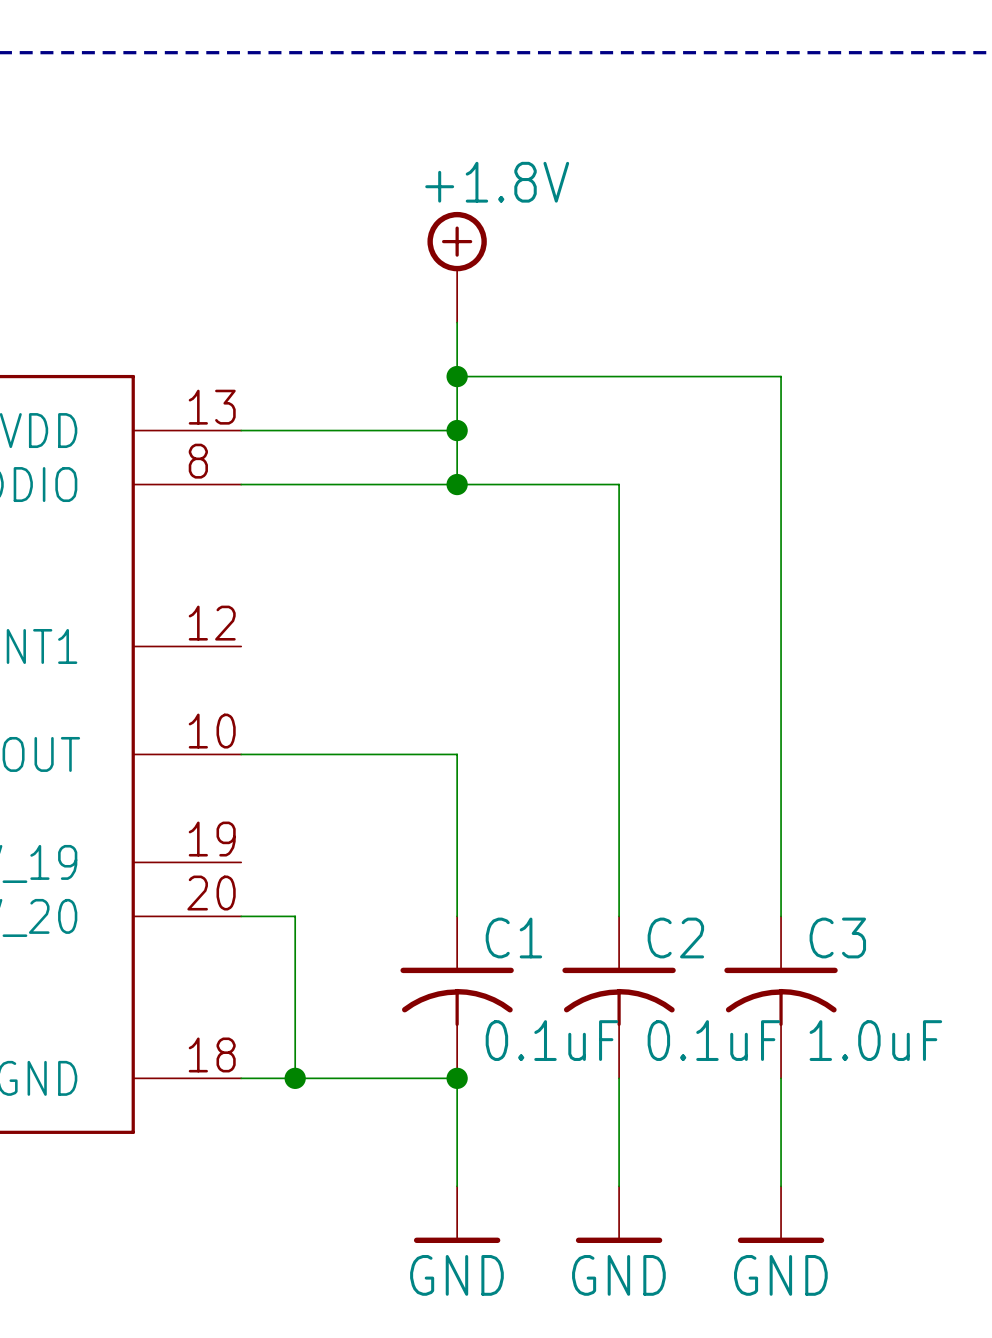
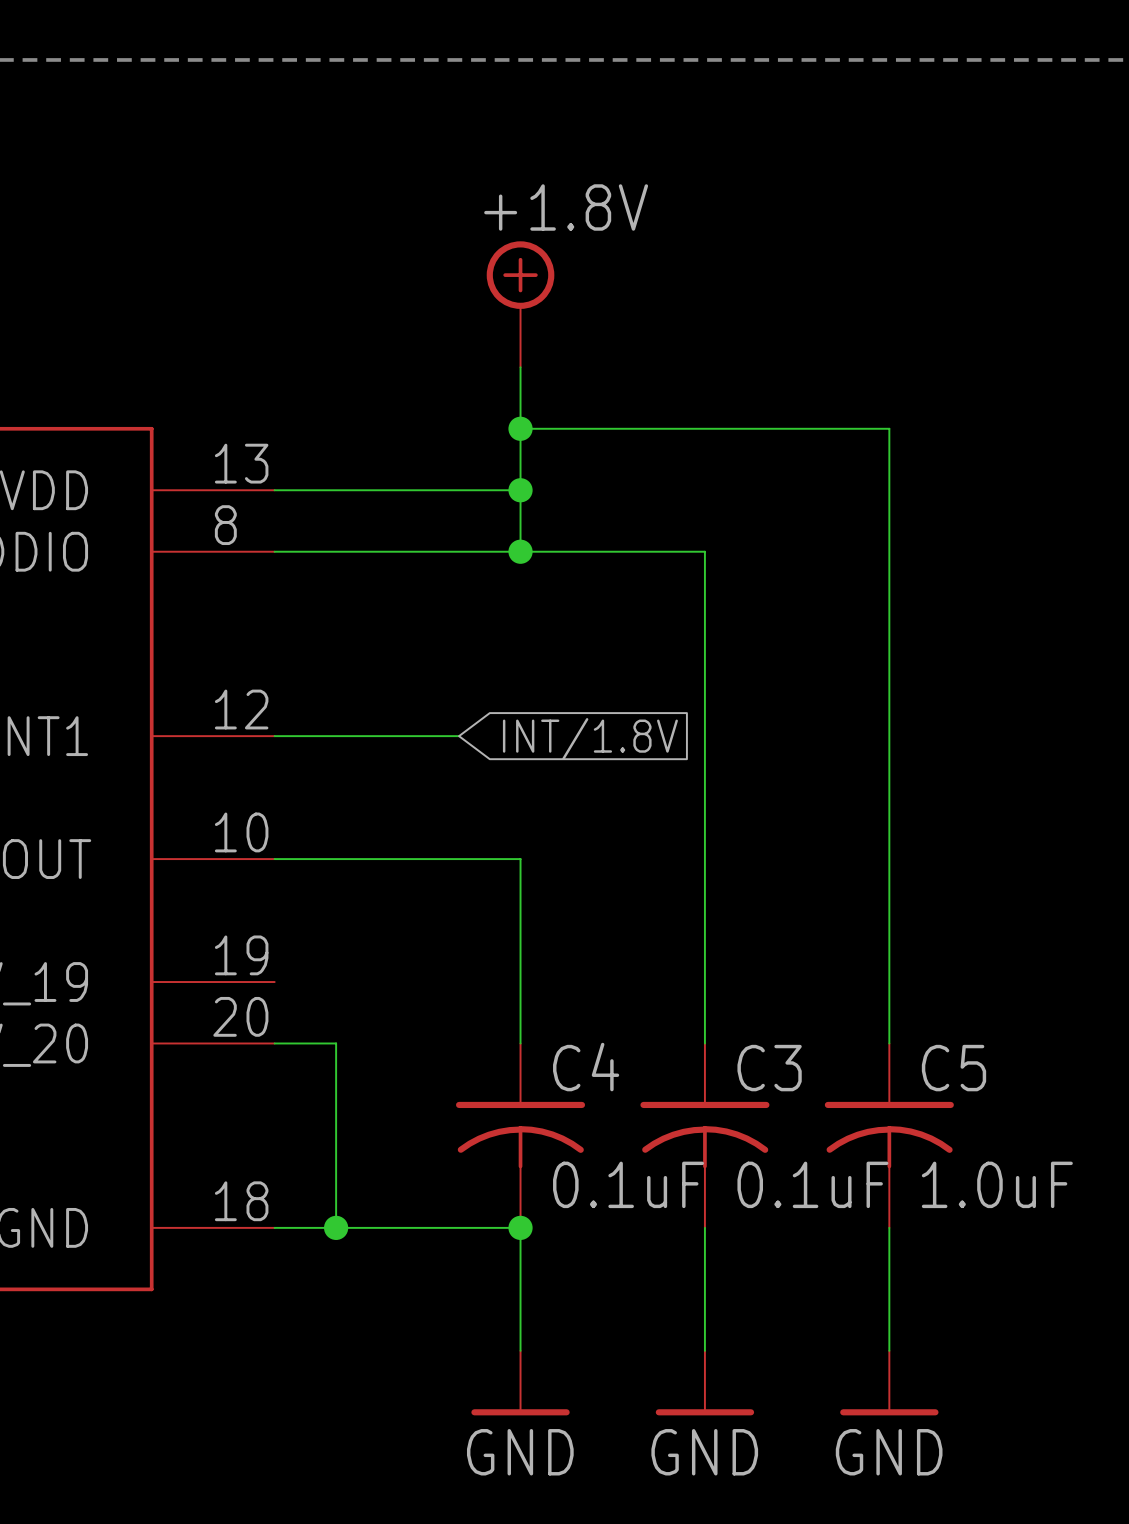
wire: none -> (274, 736) (459, 736)
global label: none -> INT/1.8V (590, 739)
C1 name: C1 (513, 937) -> C4 (586, 1067)
C2 name: C2 (675, 937) -> C3 (769, 1068)
C3 name: C3 (837, 937) -> C5 (954, 1068)

